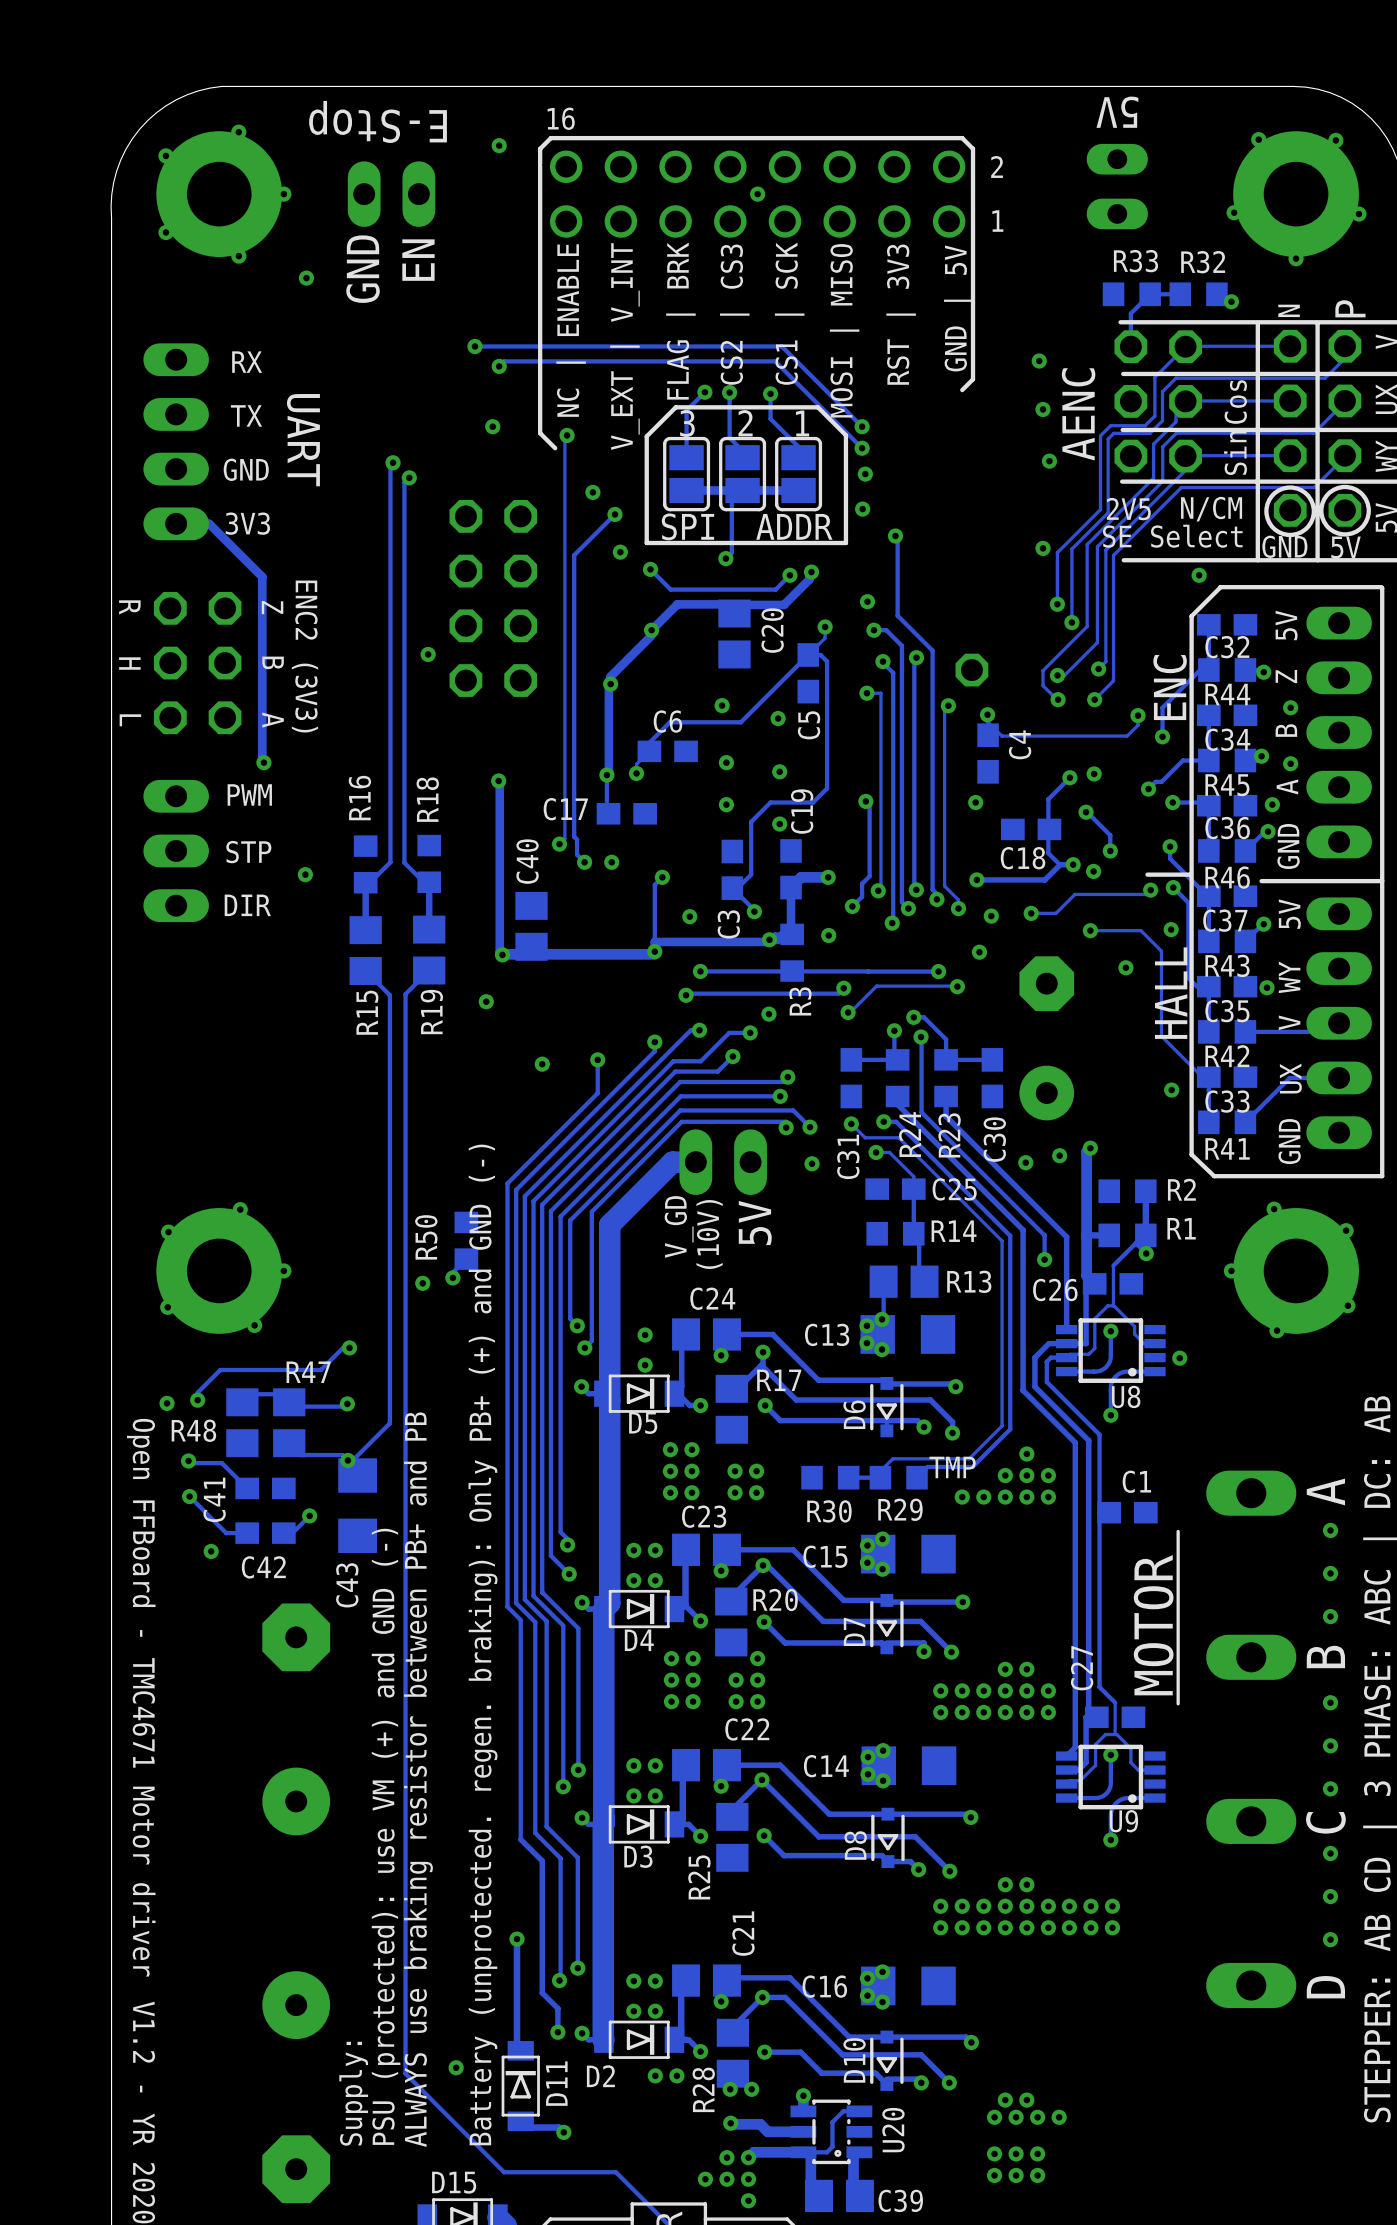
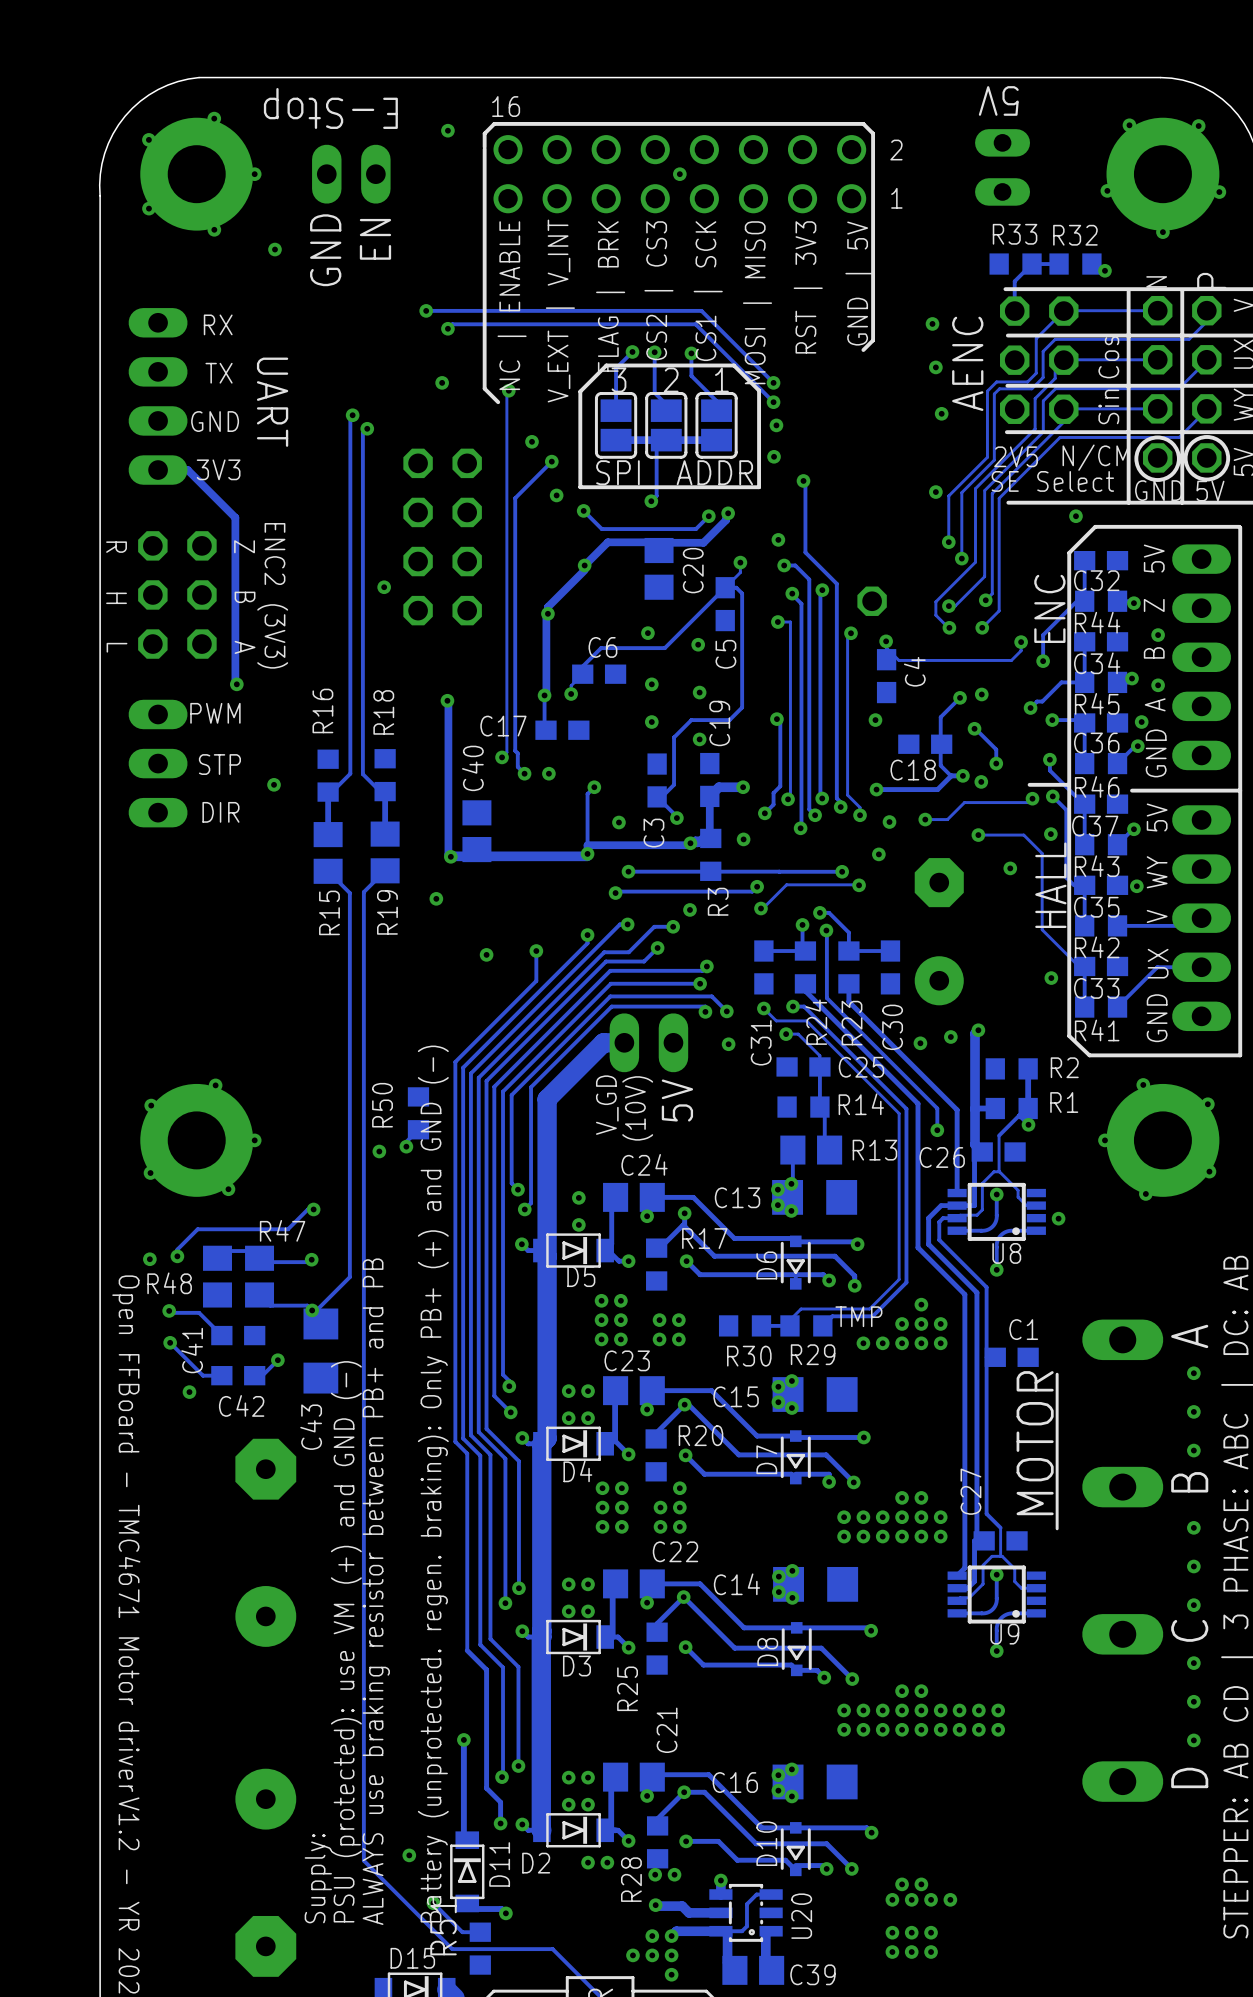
R17 footprint: [715, 1374, 748, 1444] -> [646, 1238, 668, 1291]
R20 footprint: [715, 1587, 748, 1657] -> [645, 1429, 667, 1482]
R25 footprint: [716, 1802, 749, 1872] -> [646, 1622, 668, 1675]
R28 footprint: [716, 2018, 750, 2088] -> [646, 1816, 669, 1869]
track: none -> (433, 1903) (462, 1932) (480, 1932)
via: none -> (433, 1903)
R51: none -> (480, 1948)

